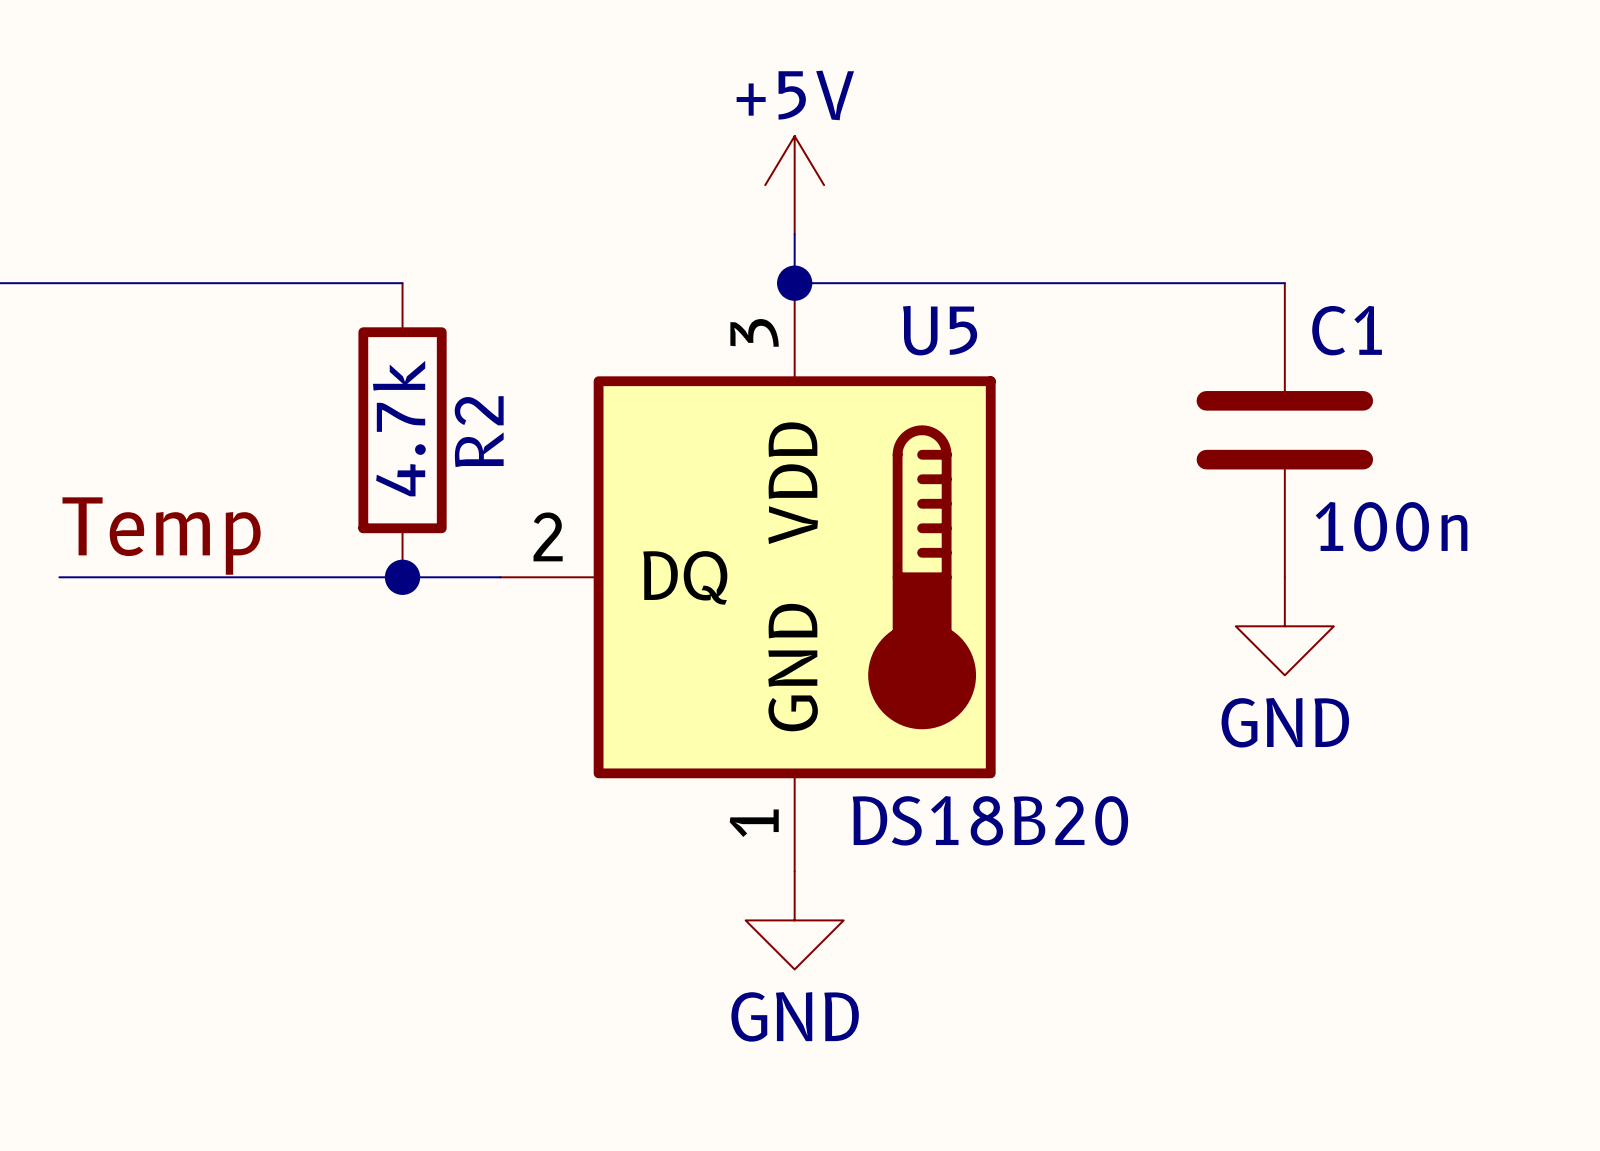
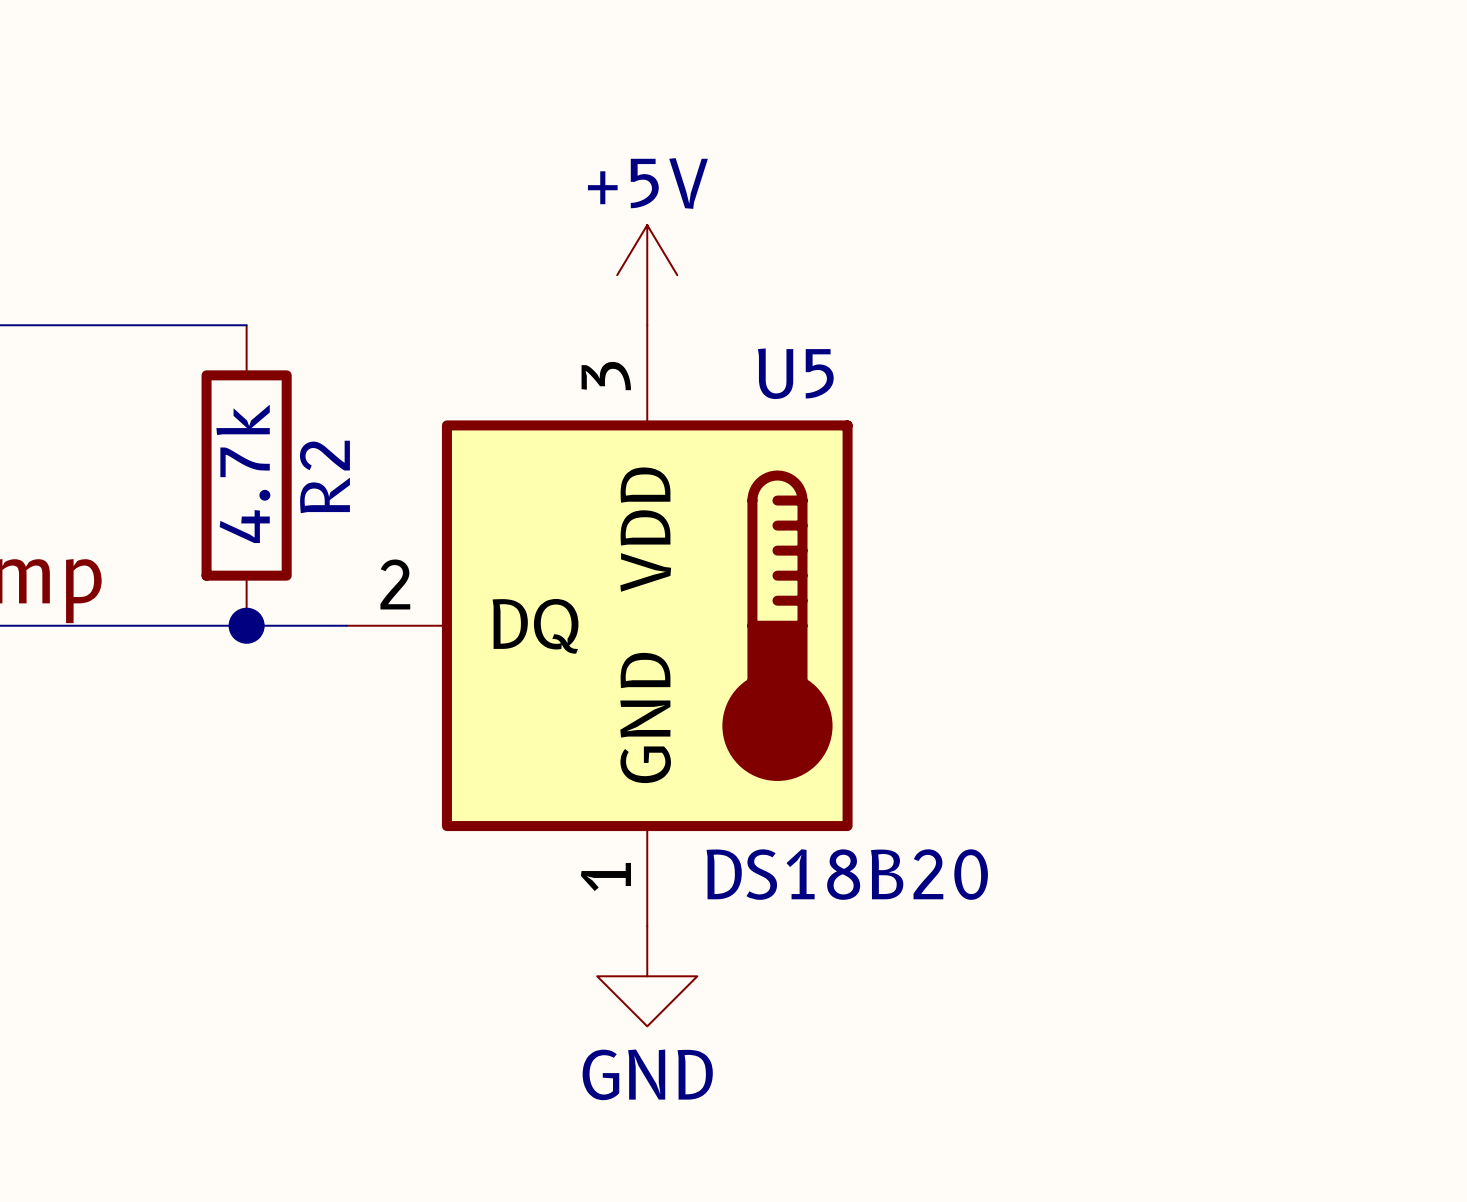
power symbol position: +5V (794, 185) -> +5V (647, 275)
wire: (794, 234) (794, 283) (1284, 283) -> none
junction: (794, 283) -> none
C1: 100n (1284, 430) -> none
power symbol: GND (1284, 626) -> none

